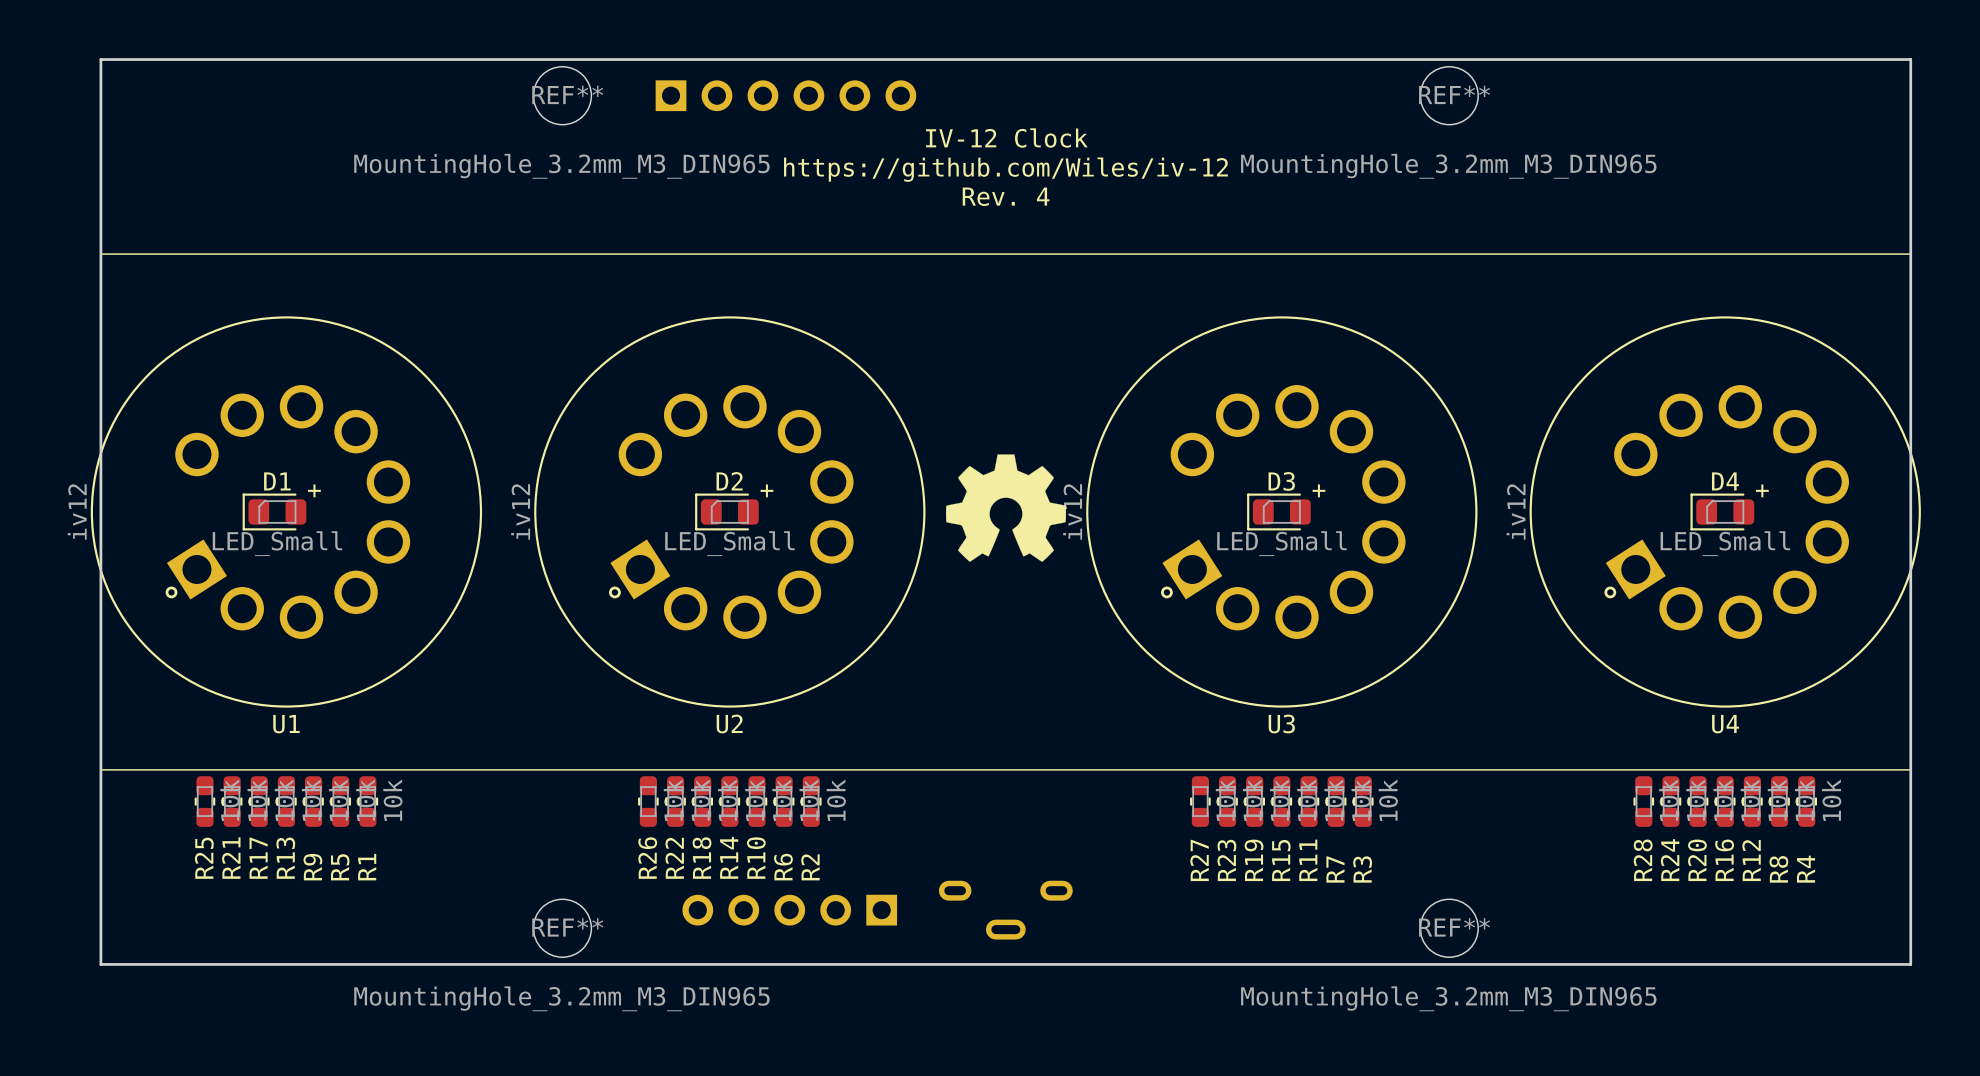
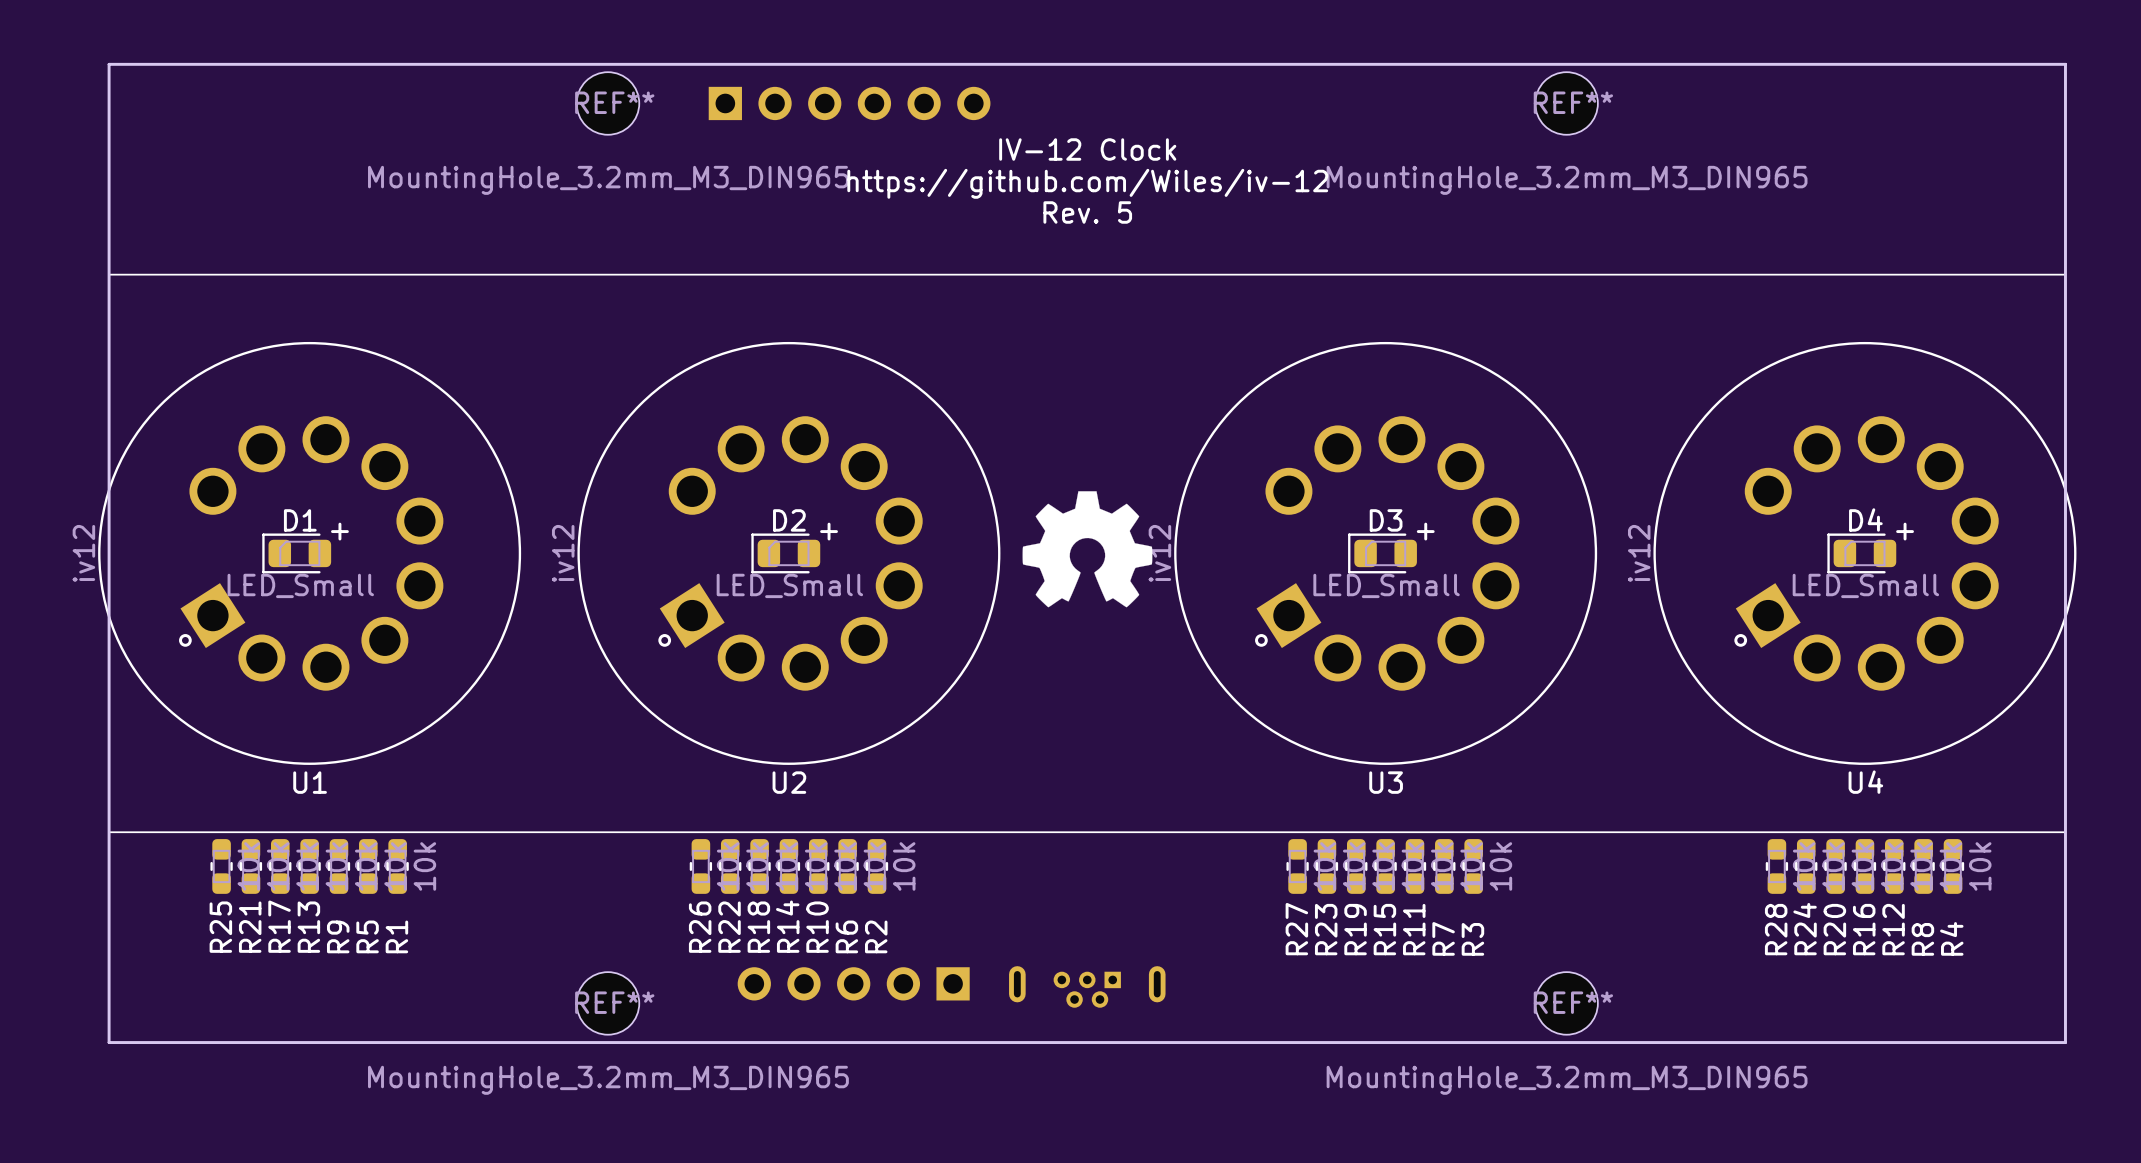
text: Rev. 4 (1006, 196) -> Rev. 5 (1087, 212)
part footprint: [938, 880, 1073, 940] -> [1009, 966, 1166, 1008]

